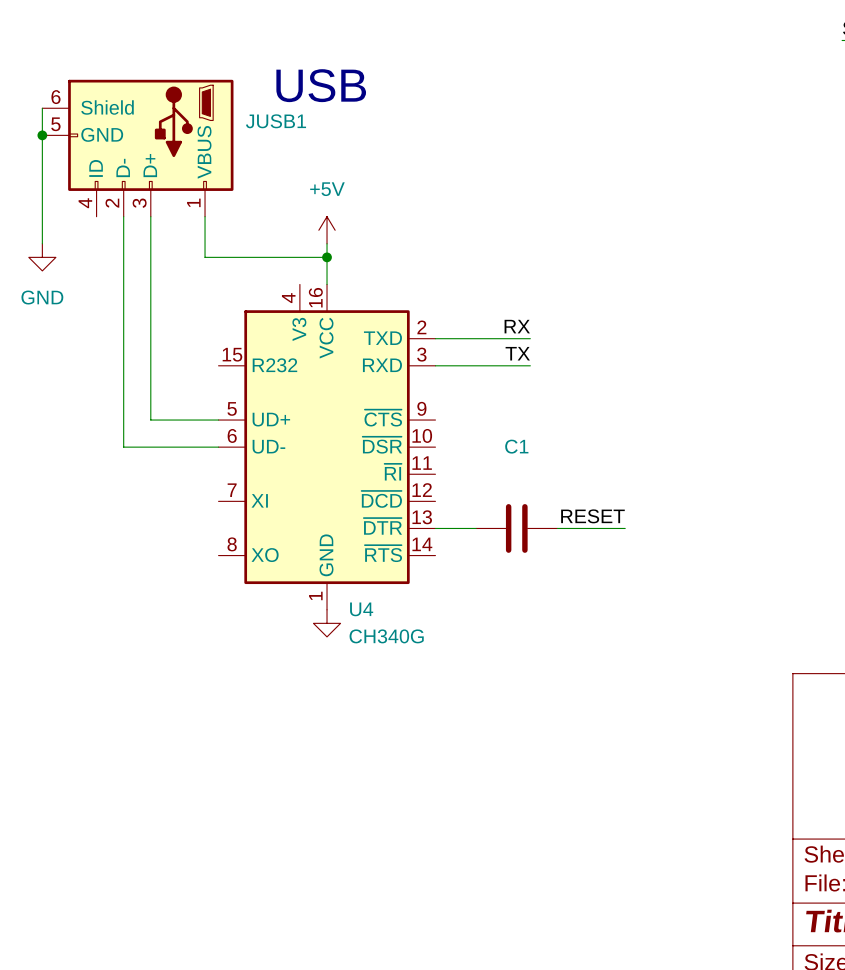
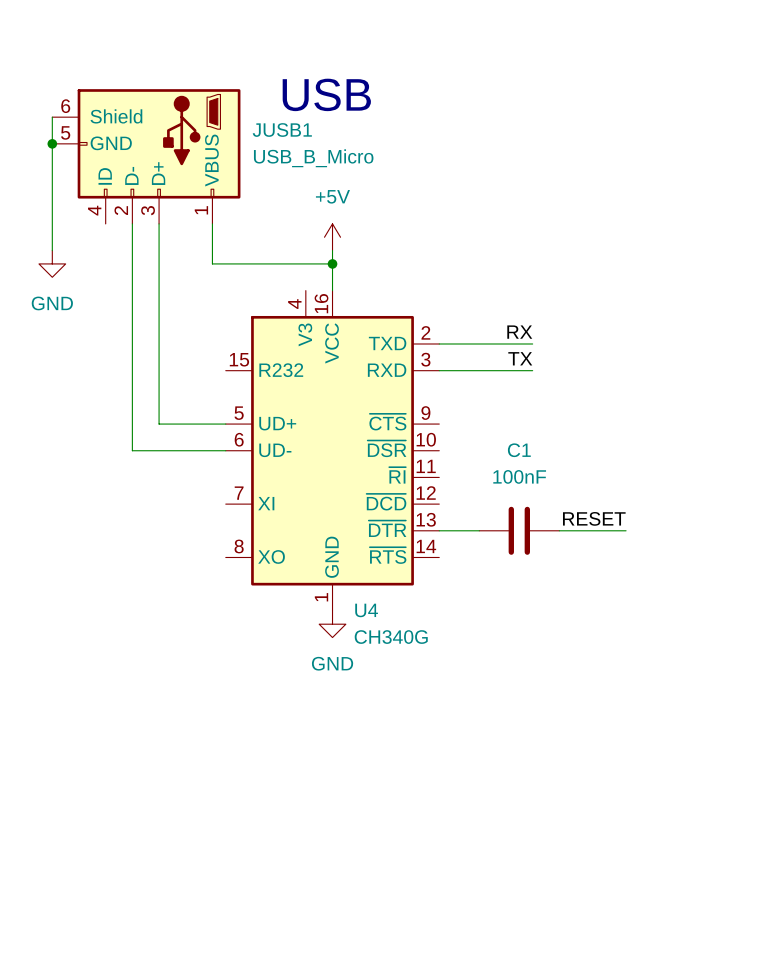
JUSB1 value: none -> USB_B_Micro (313, 158)
C1 value: none -> 100nF (519, 476)
power symbol text: none -> GND (332, 663)

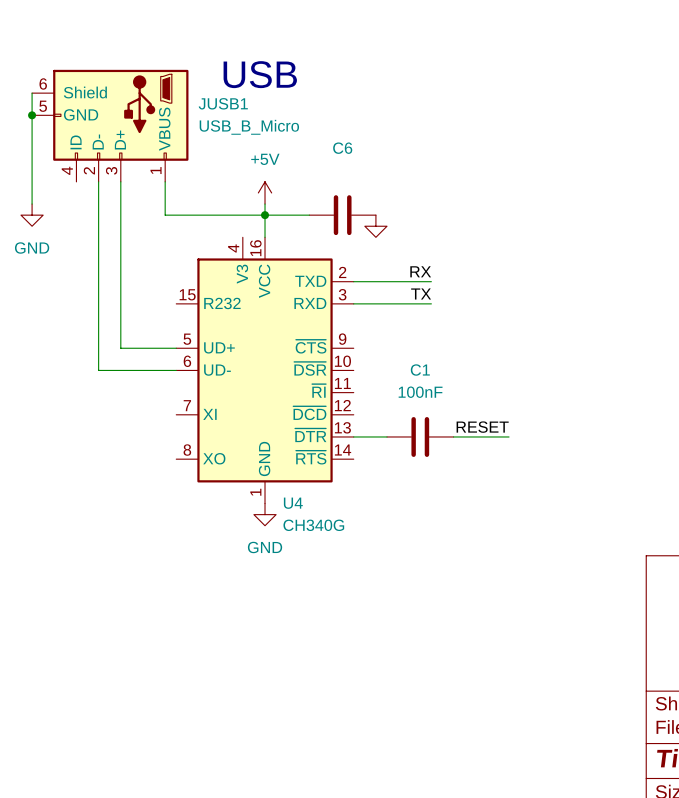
wire: none -> (265, 215) (309, 215)
C6: none -> (342, 215)
power symbol: none -> (375, 226)

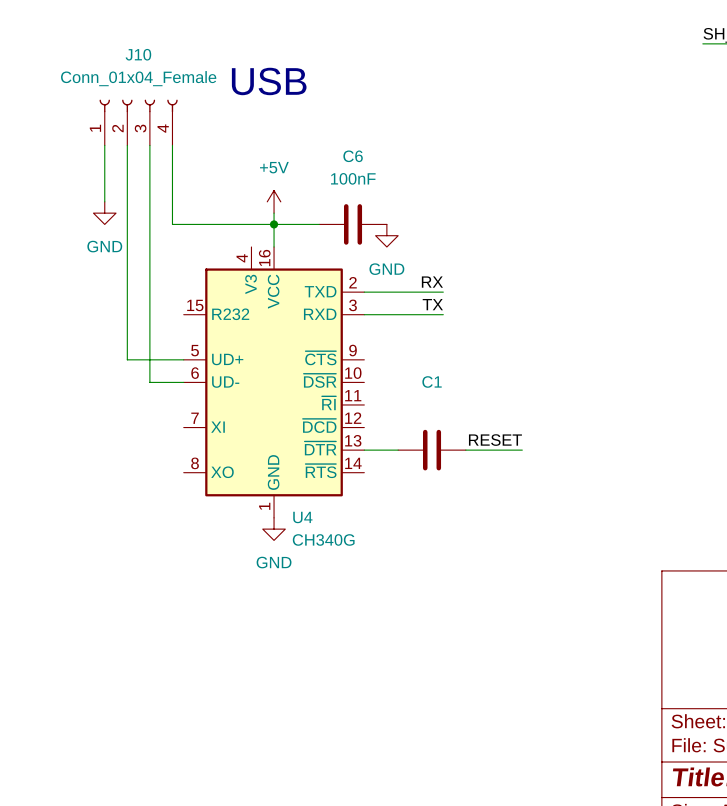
wire: (32, 93) (32, 204) -> none
J10: none -> Conn_01x04_Female (138, 122)
junction: (32, 115) -> none
JUSB1: USB_B_Micro (110, 125) -> none
C6 value: none -> 100nF (353, 178)
wire: (98, 192) (98, 370) (142, 370) -> (149, 145) (149, 382)
power symbol position: GND (32, 215) -> GND (104, 213)
power symbol text: none -> GND (386, 269)
C1 value: 100nF (420, 392) -> none

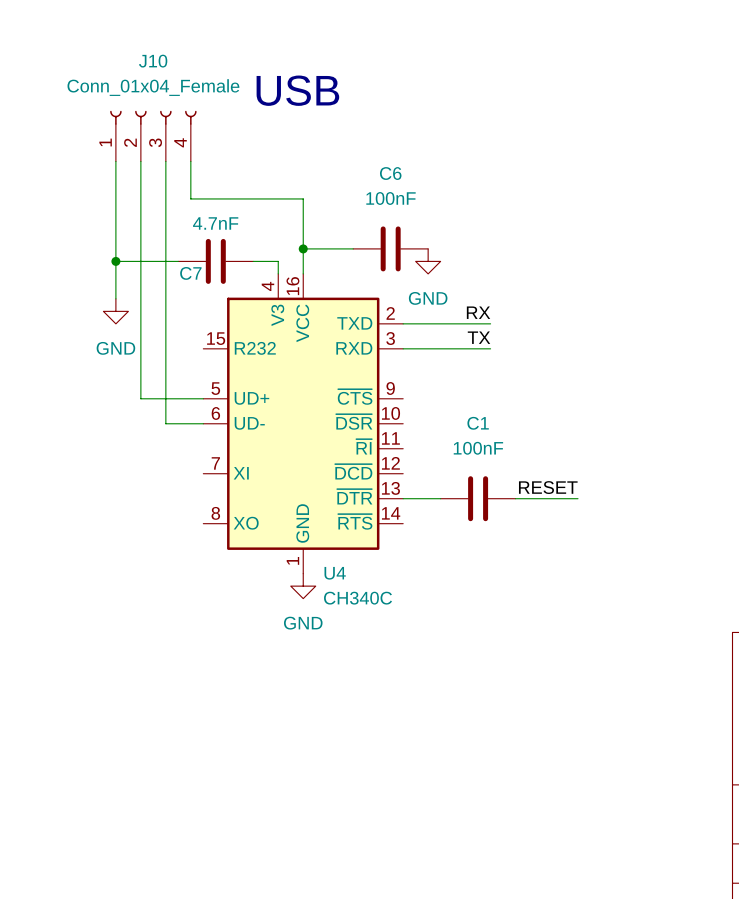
wire: (172, 179) (172, 224) (274, 224) -> (190, 198) (303, 198) (303, 236)
wire: none -> (115, 223) (115, 298)
power symbol: +5V (274, 201) -> none
power symbol position: GND (104, 213) -> GND (115, 311)
wire: none -> (115, 261) (178, 261)
junction: none -> (115, 261)
C7: none -> 4.7nF (215, 261)
wire: none -> (253, 261) (278, 261) (278, 273)
C1 value: none -> 100nF (478, 448)
U4 value: CH340G (323, 539) -> CH340C (358, 598)

